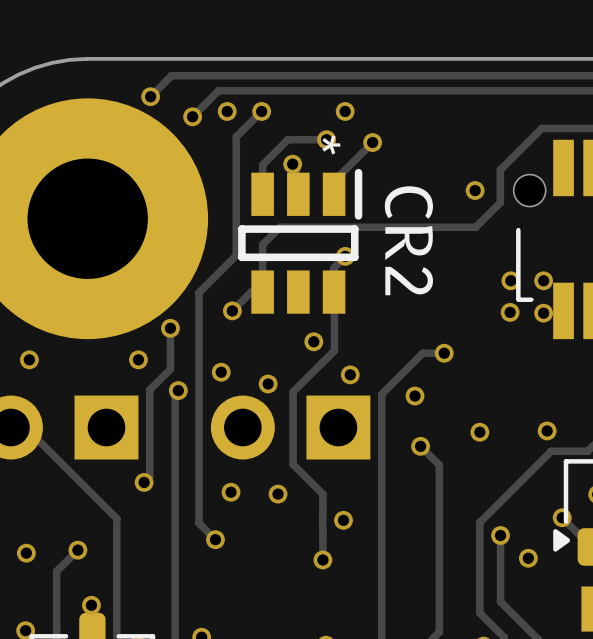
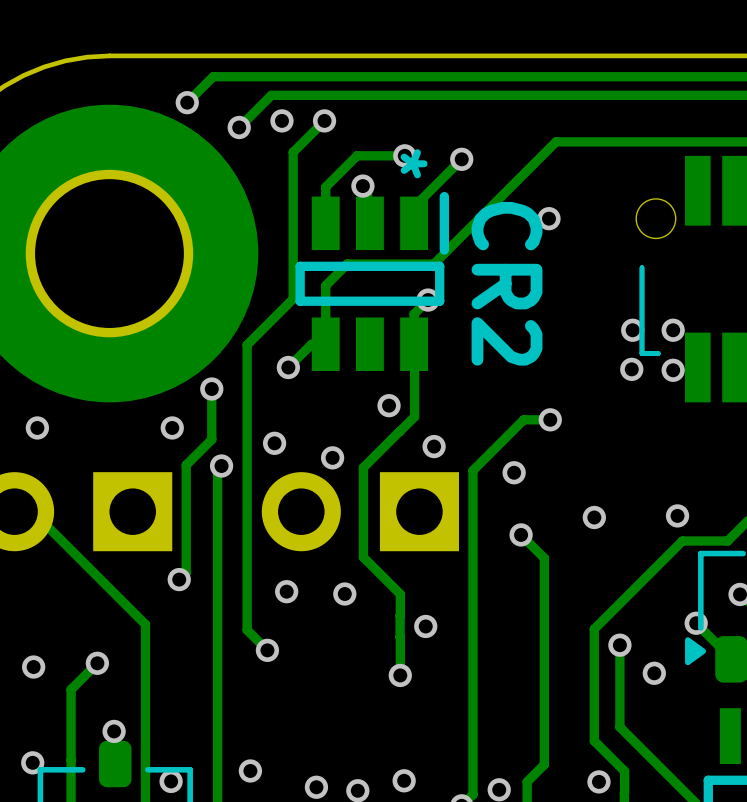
via: (345, 111) -> none
track: (541, 128) (500, 169) (500, 202) (475, 227) (350, 227) -> (671, 141) (556, 141) (433, 264)
via position: (475, 190) -> (548, 218)

